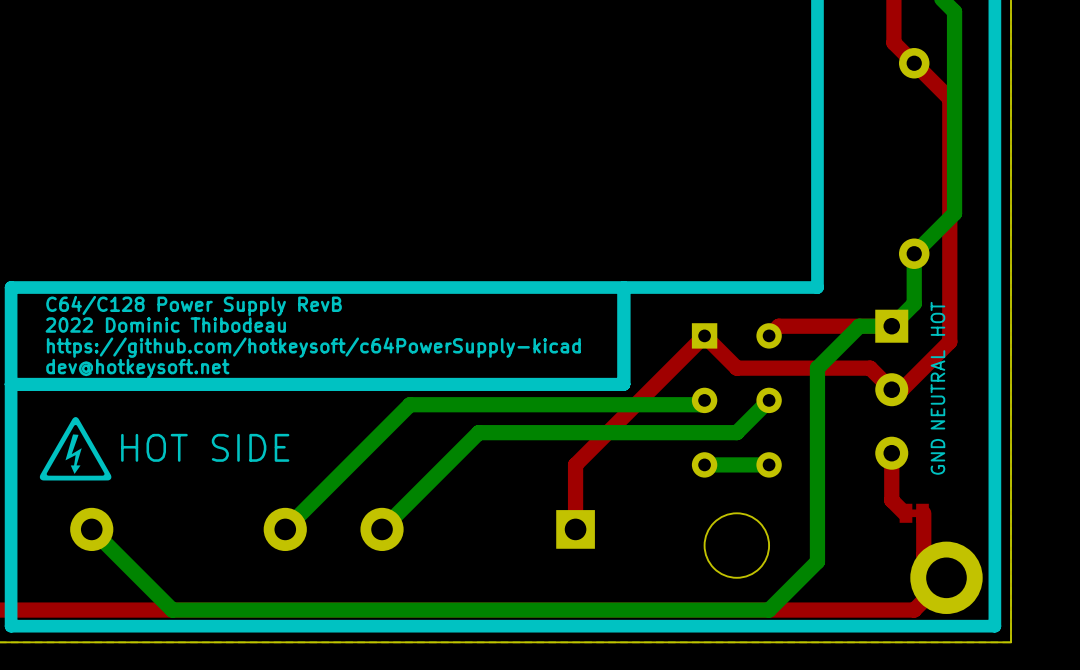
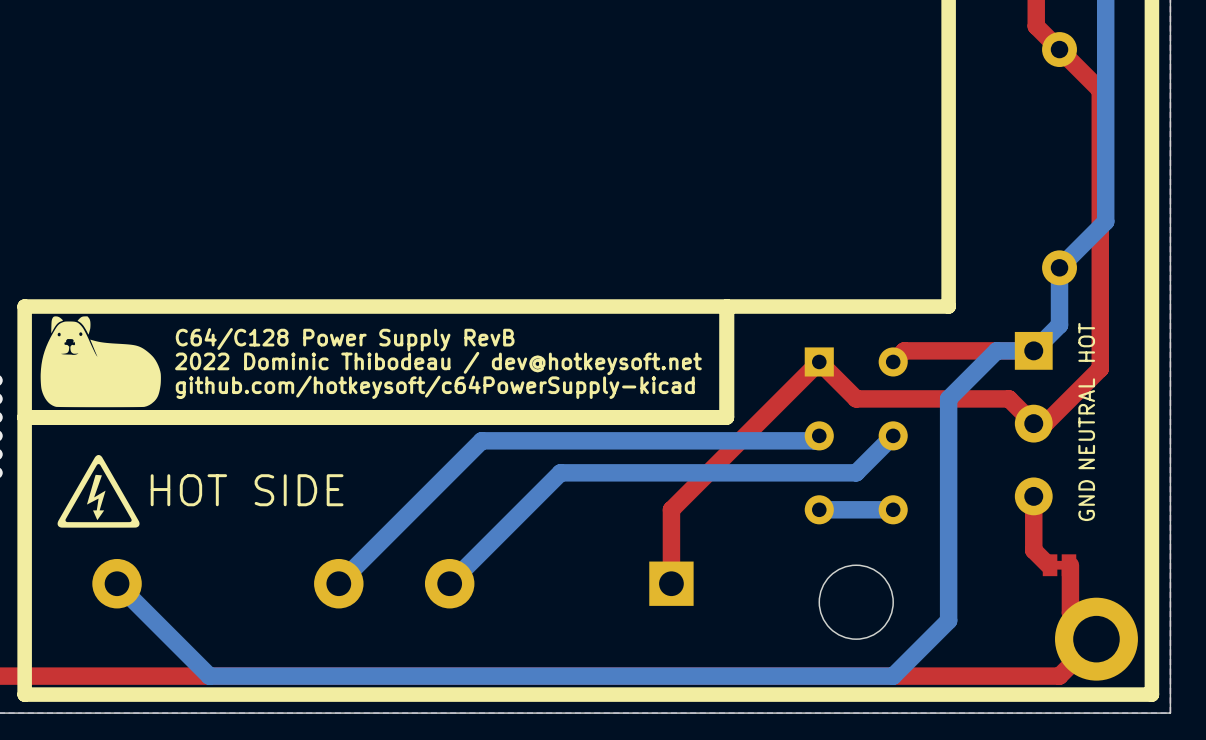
drawing: none -> [40, 316, 161, 408]
text position: C64/C128 Power Supply RevB (194, 306) -> C64/C128 Power Supply RevB (345, 339)
text: 2022 Dominic Thibodeau (165, 325) -> 2022 Dominic Thibodeau / dev@hotkeysoft.net (438, 363)
text: https://github.com/hotkeysoft/c64PowerSupply-kicad (313, 347) -> github.com/hotkeysoft/c64PowerSupply-kicad (435, 387)
text: dev@hotkeysoft.net (137, 368) -> none

